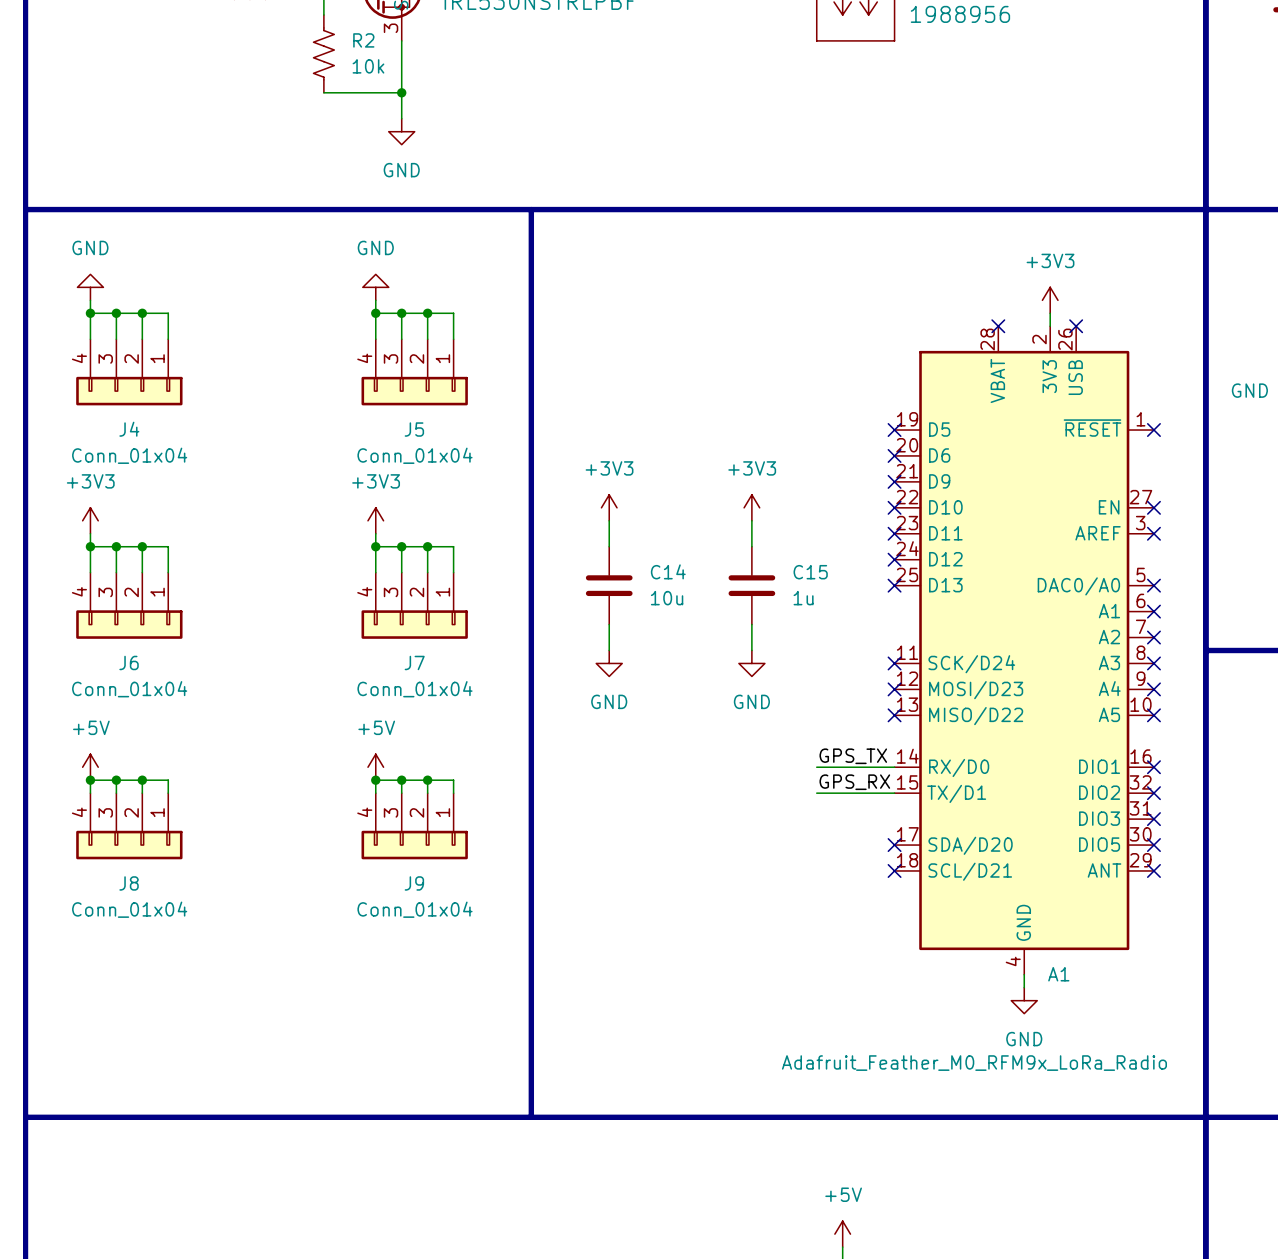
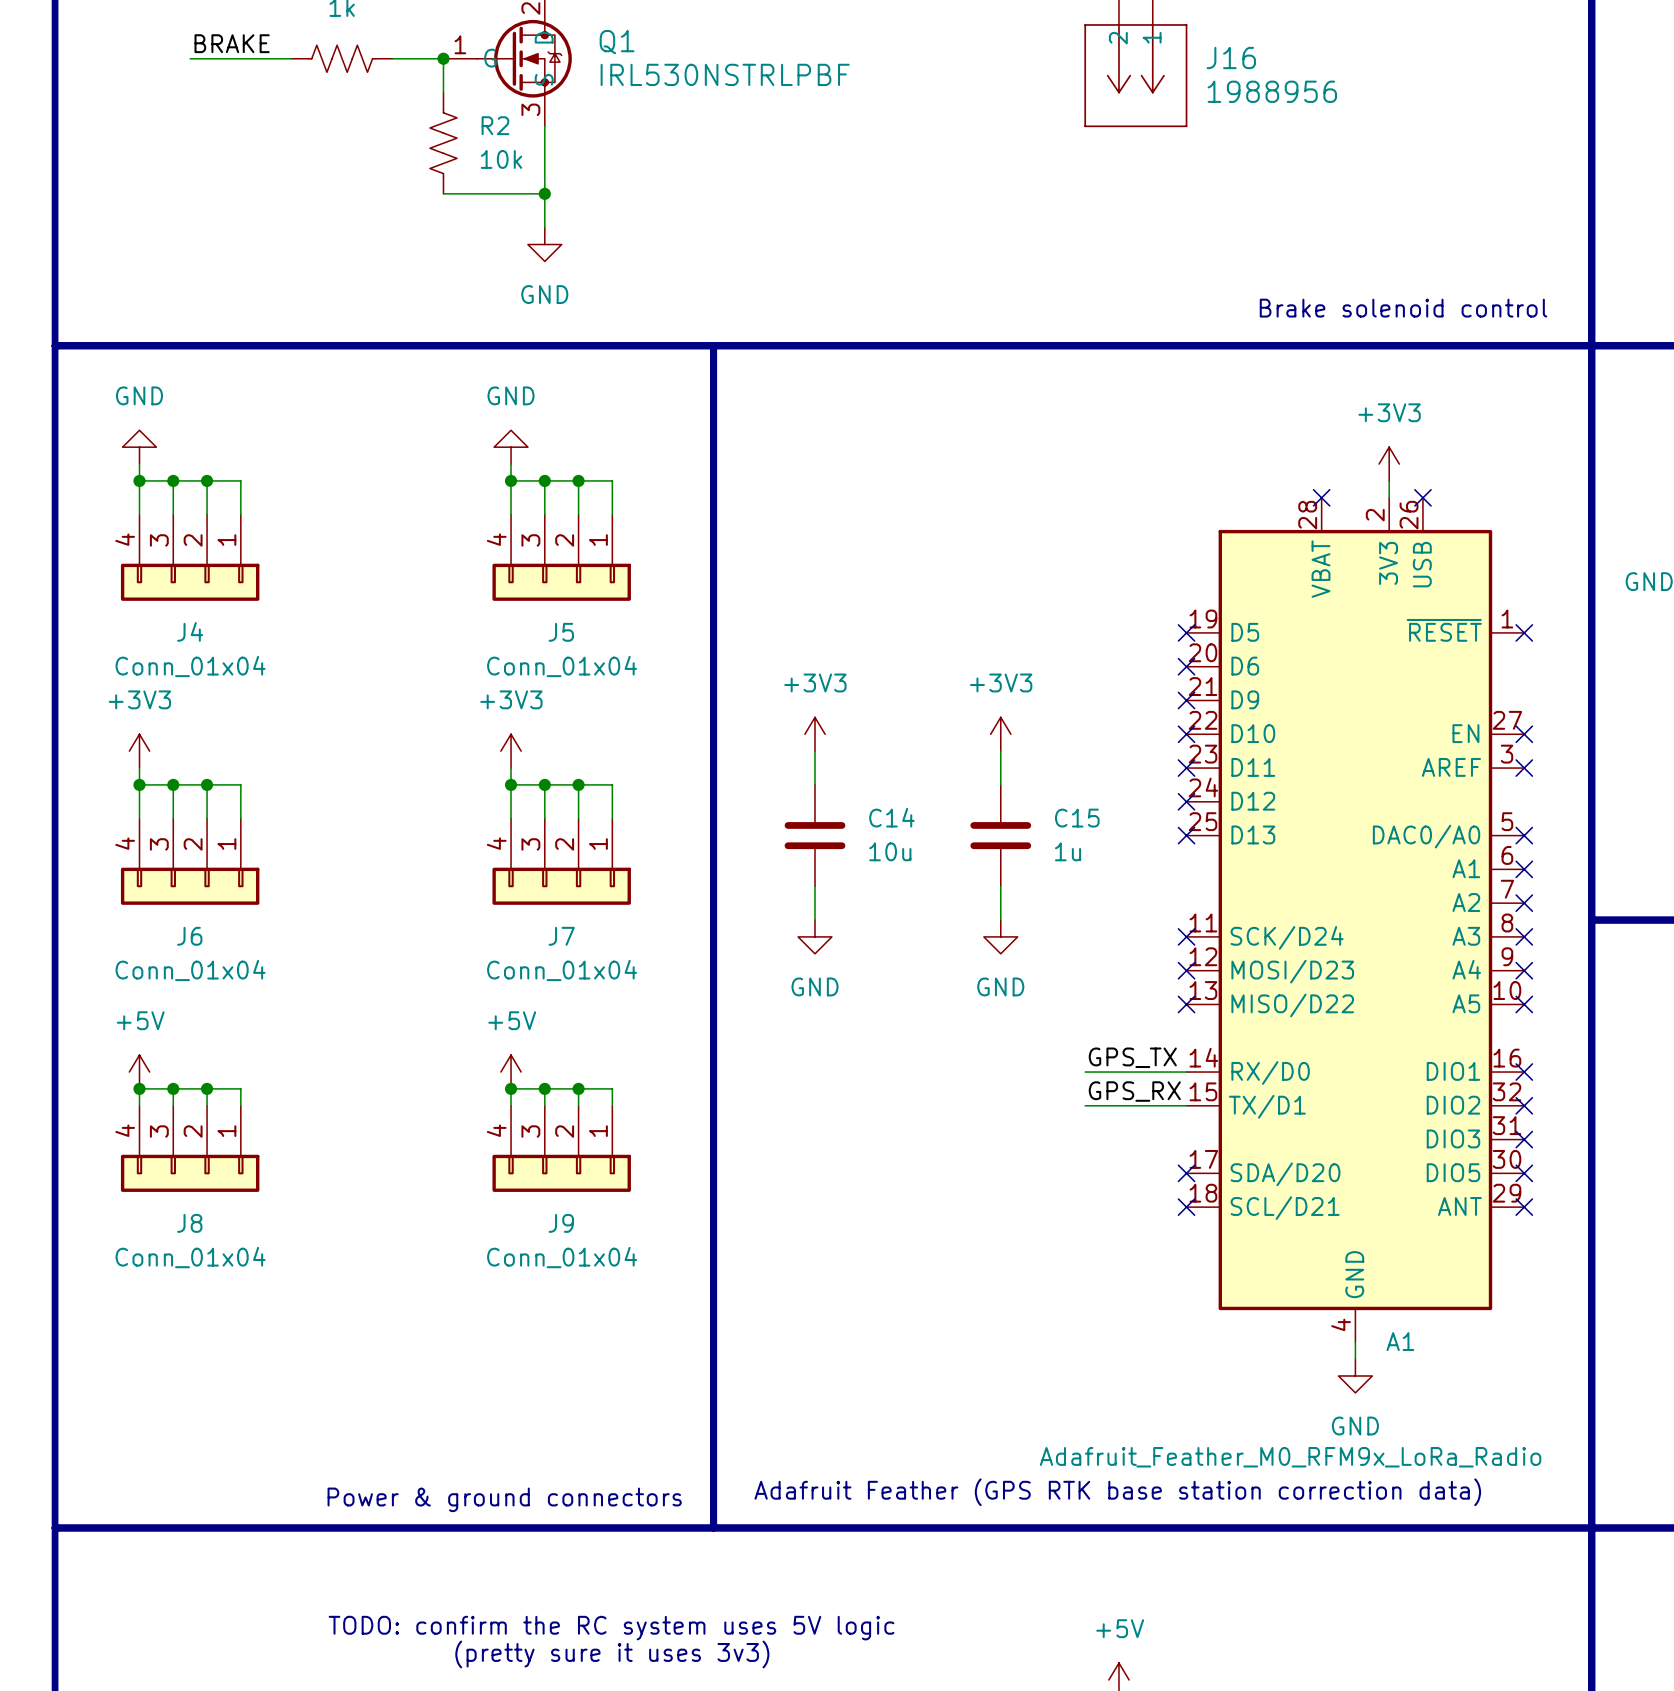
text: none -> Brake solenoid control (1403, 308)
text: none -> Adafruit Feather (GPS RTK base station correction data) (1117, 1492)
text: none -> Power & ground connectors (504, 1499)
text: none -> TODO: confirm the RC system uses 5V logic (611, 1628)
text: none -> (pretty sure it uses 3v3) (612, 1654)

